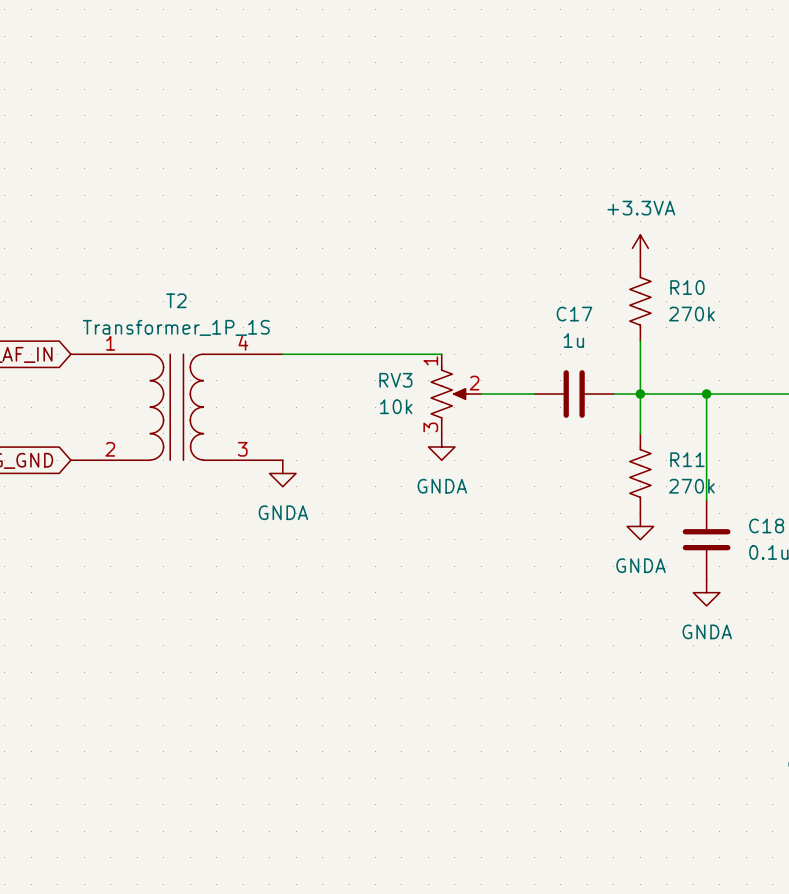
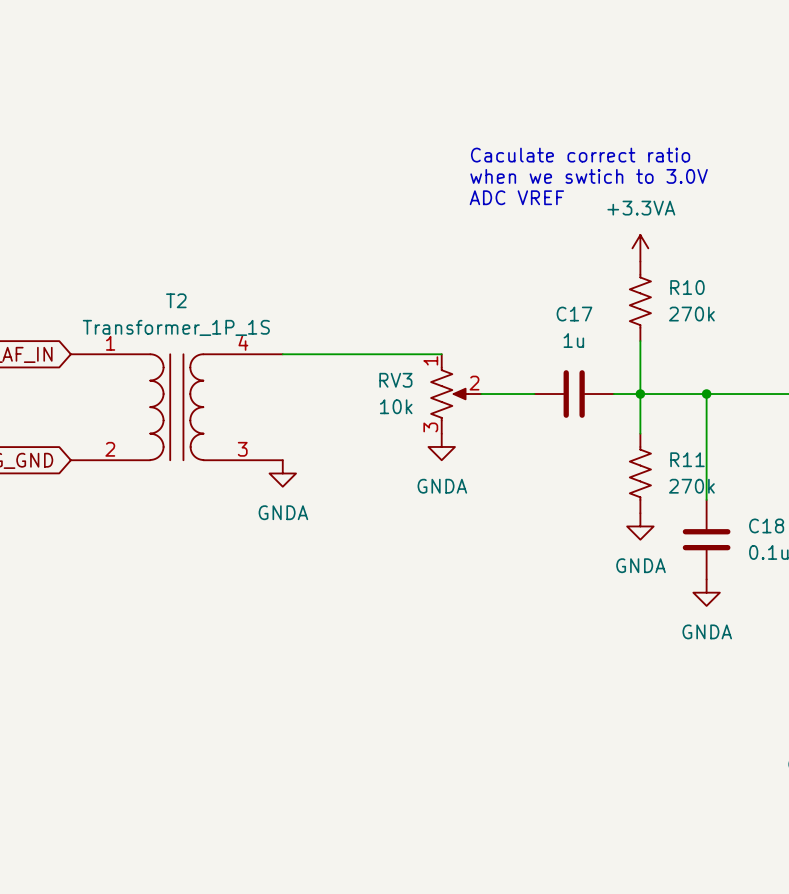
text: none -> Caculate correct ratio (580, 155)
text: none -> when we swtich to 3.0V (589, 176)
text: none -> ADC VREF (516, 197)

